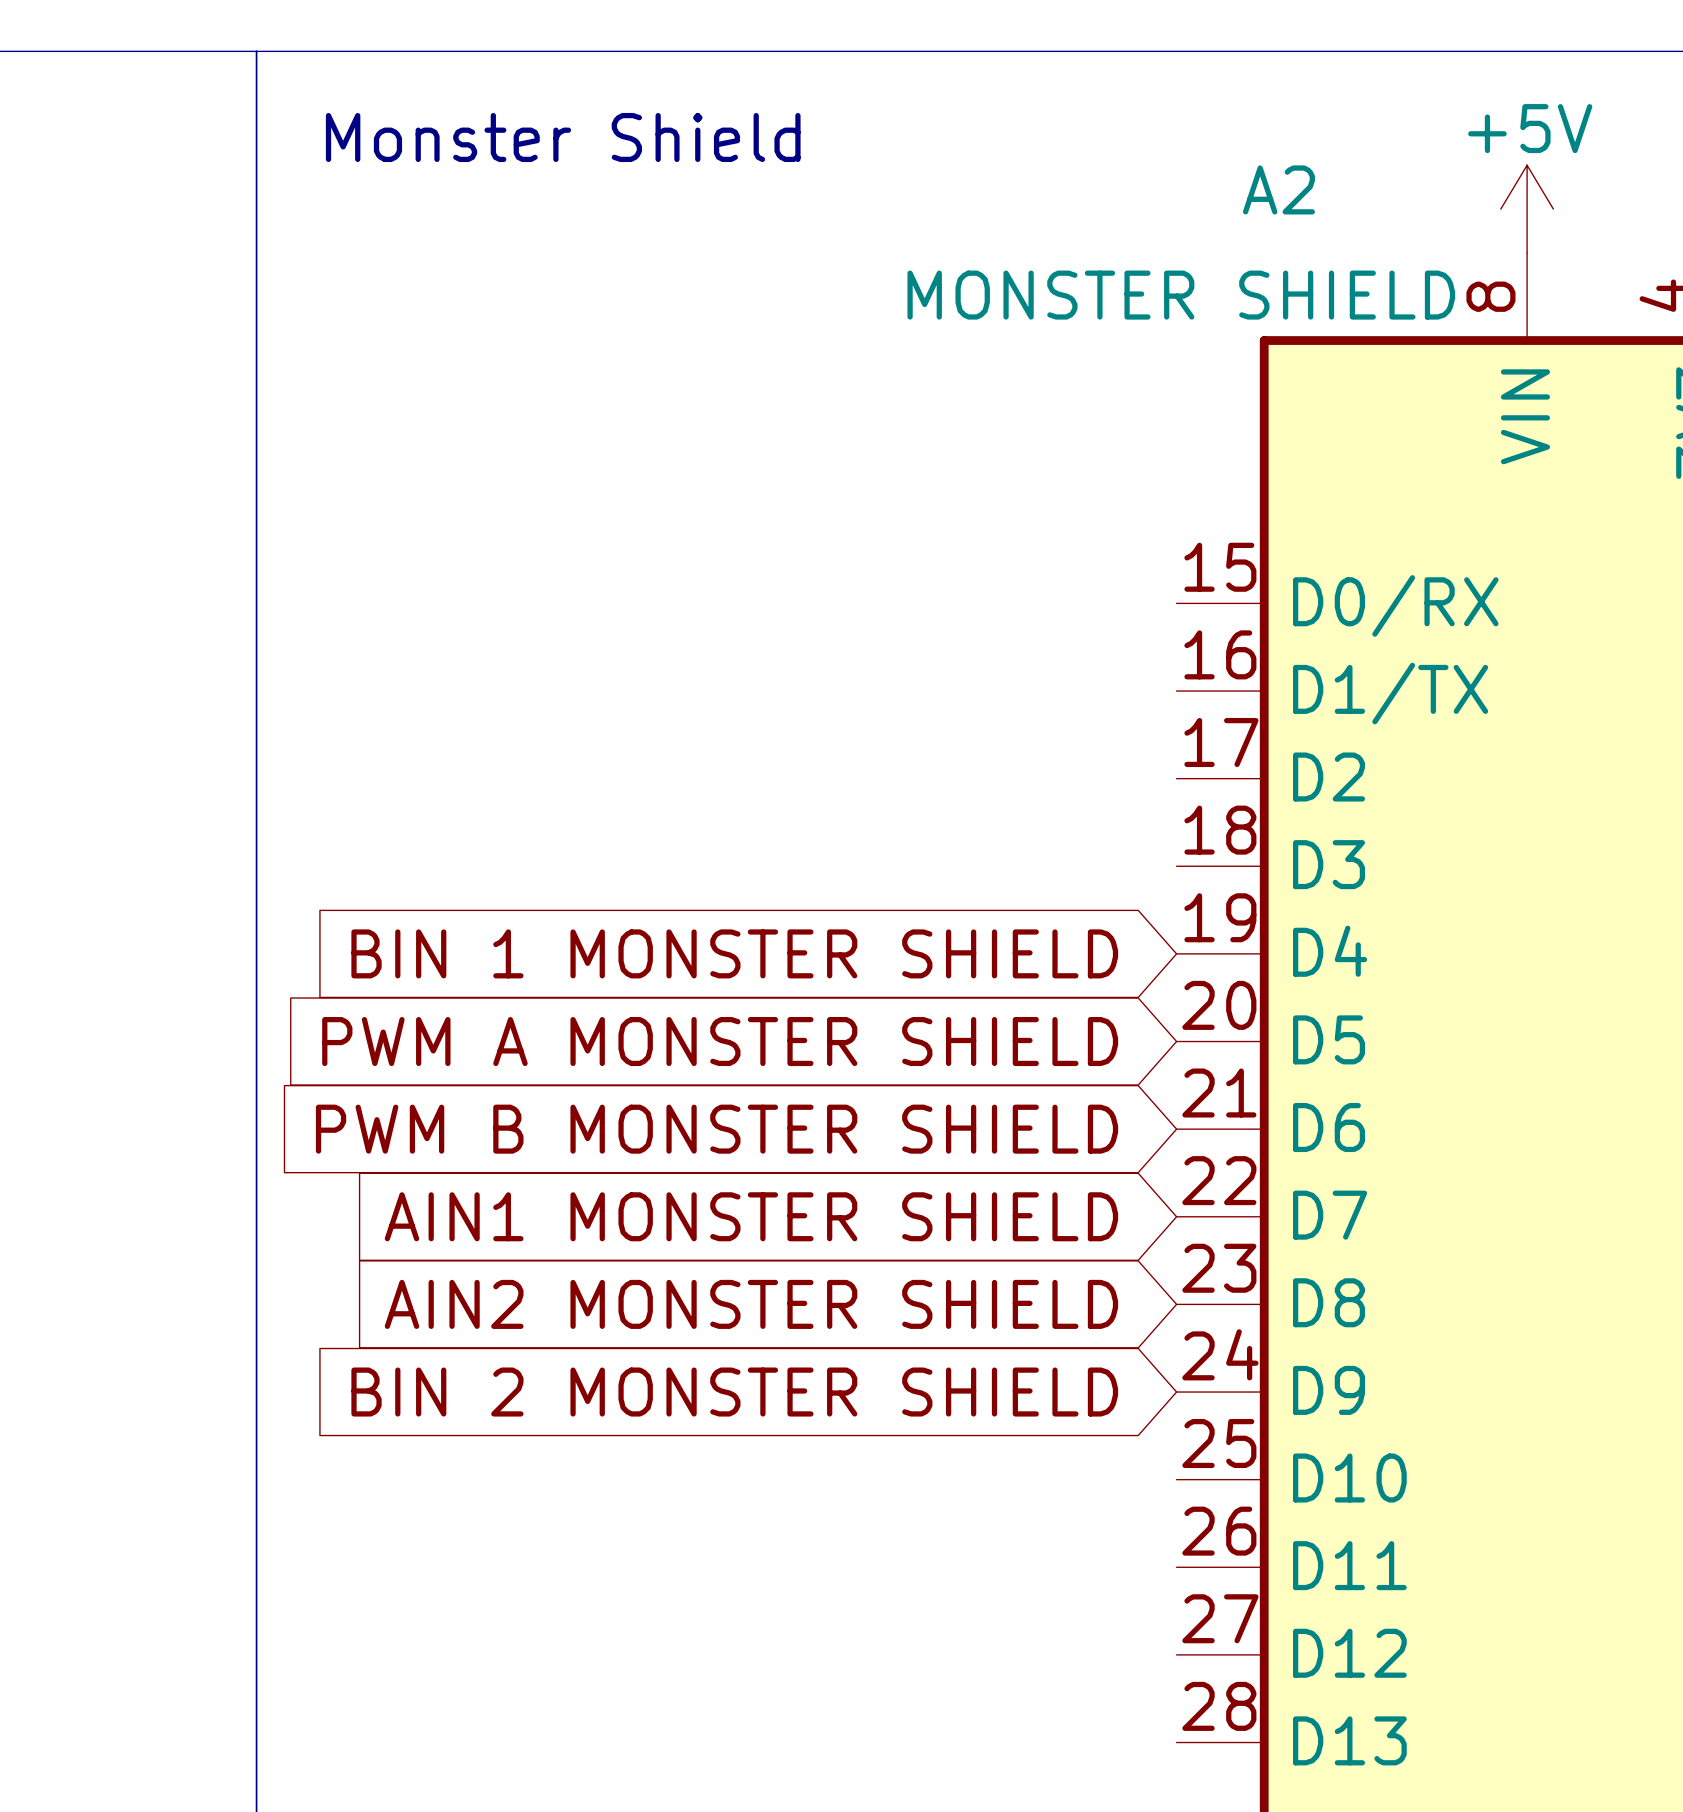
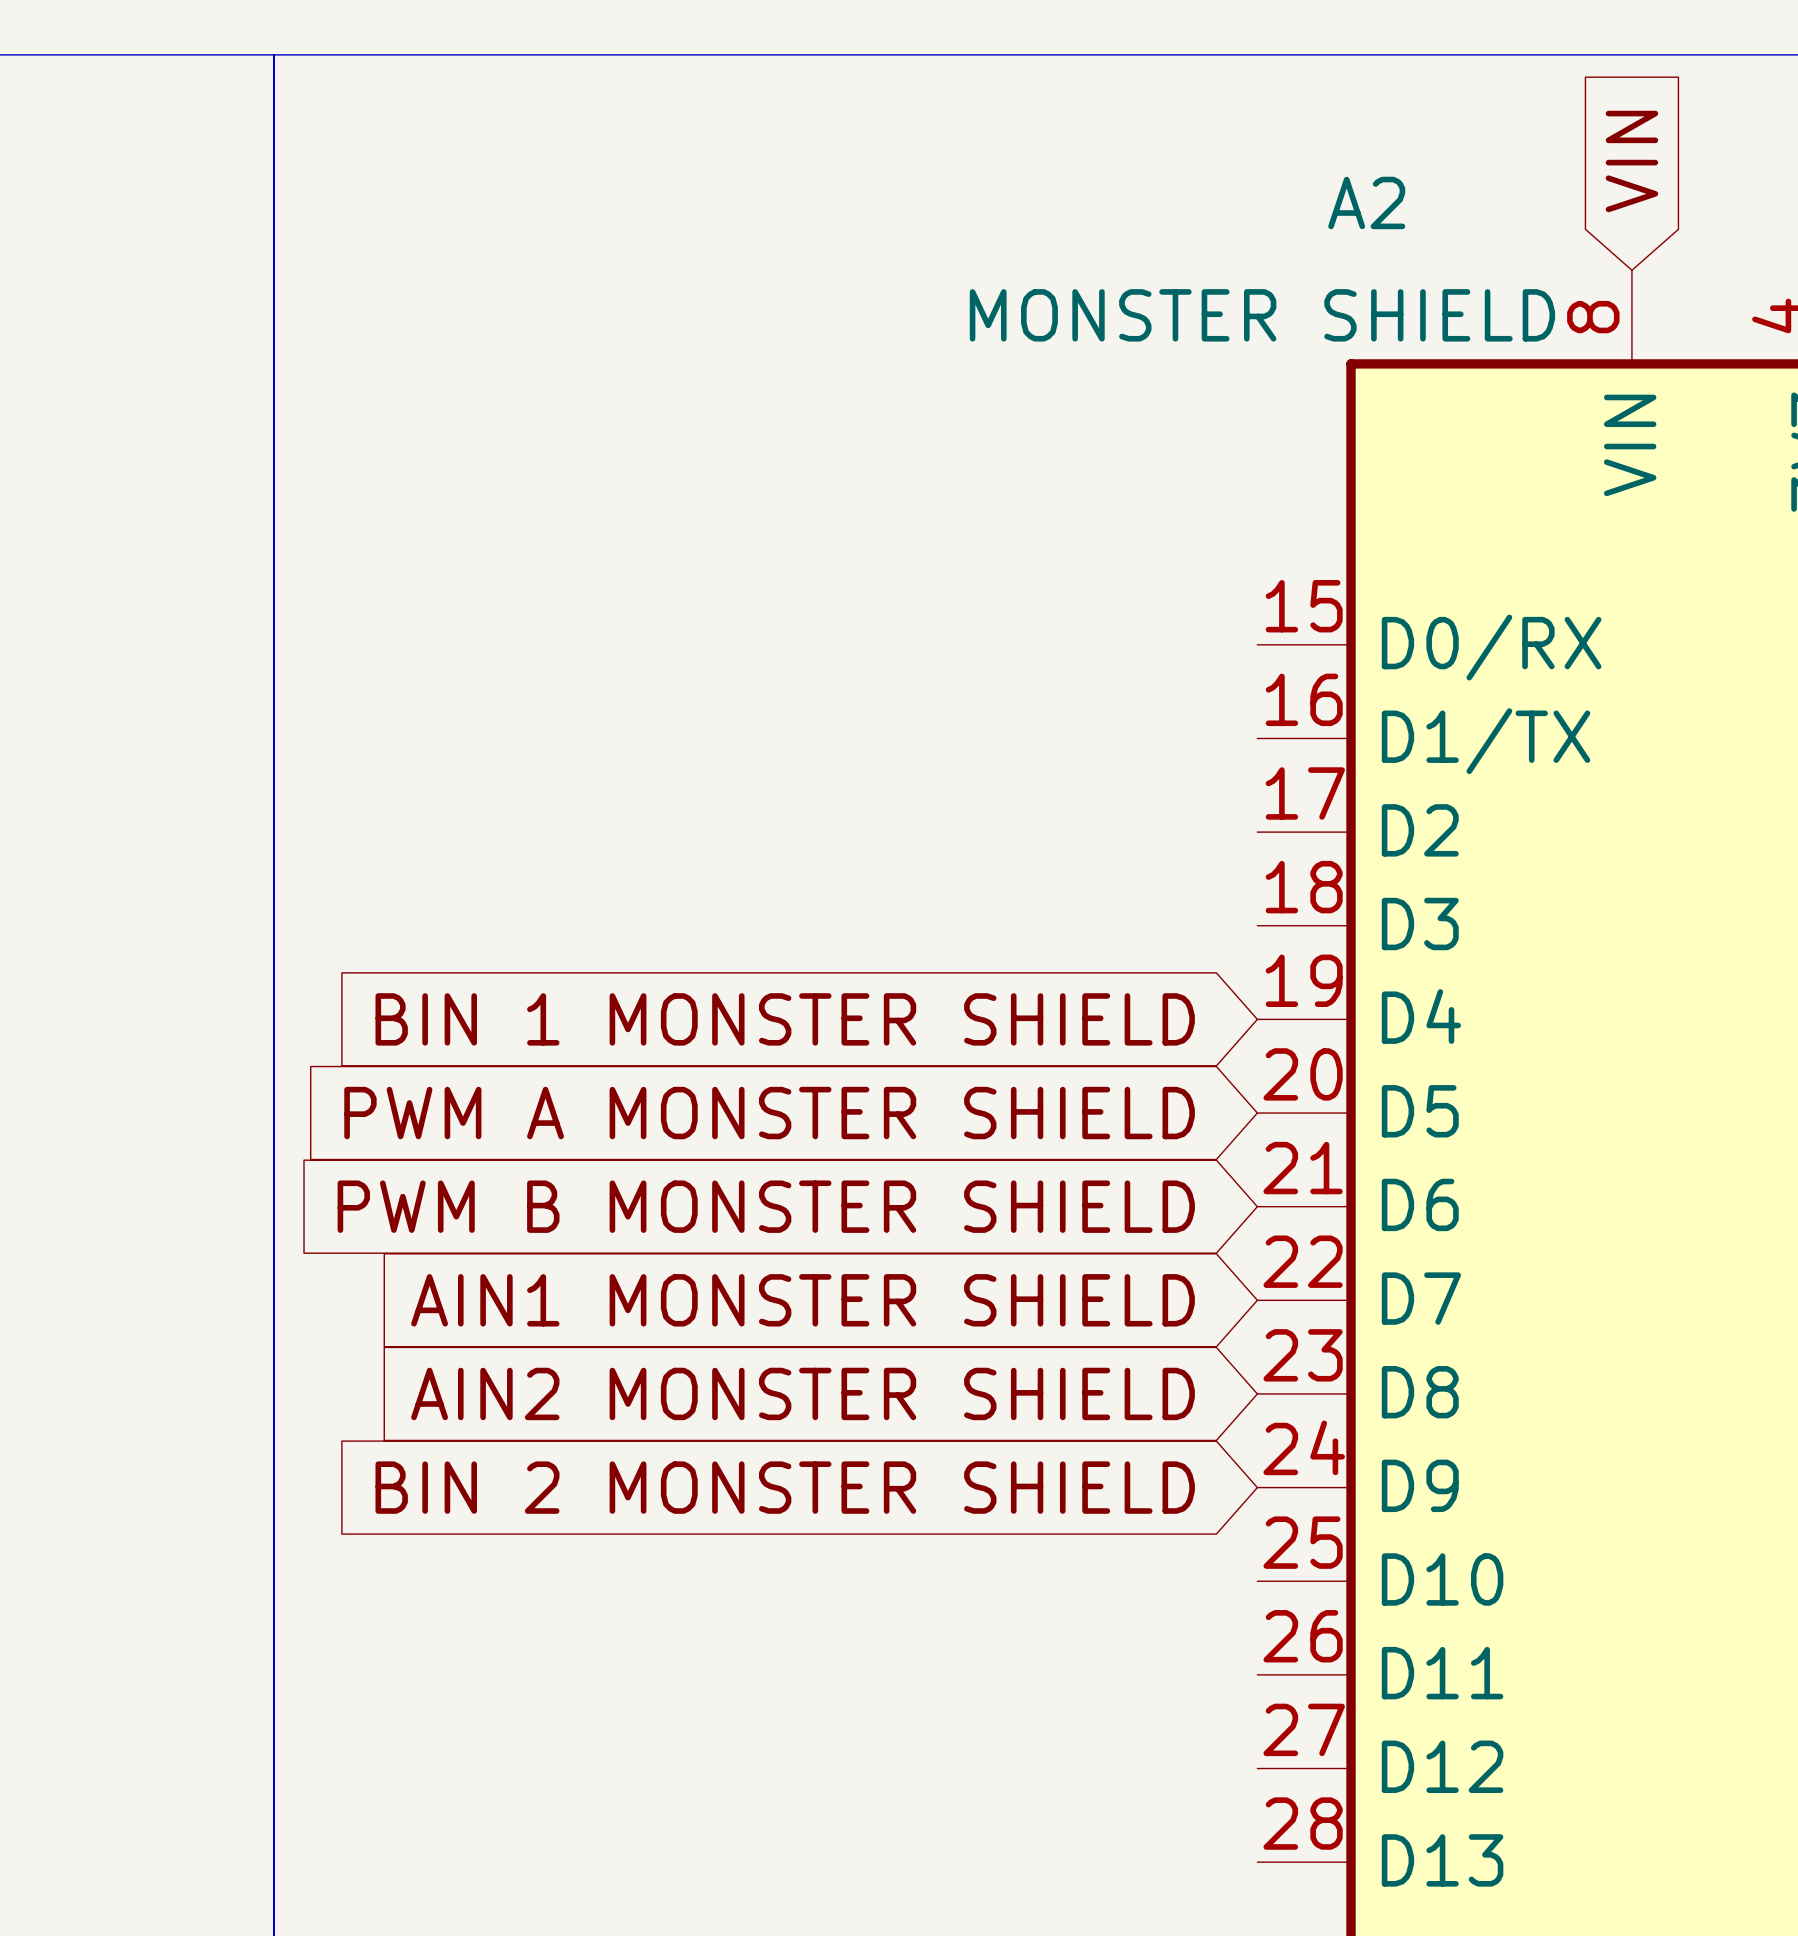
text: Monster Shield (563, 137) -> none
global label: none -> VIN (1631, 161)
power symbol: +5V (1527, 209) -> none

